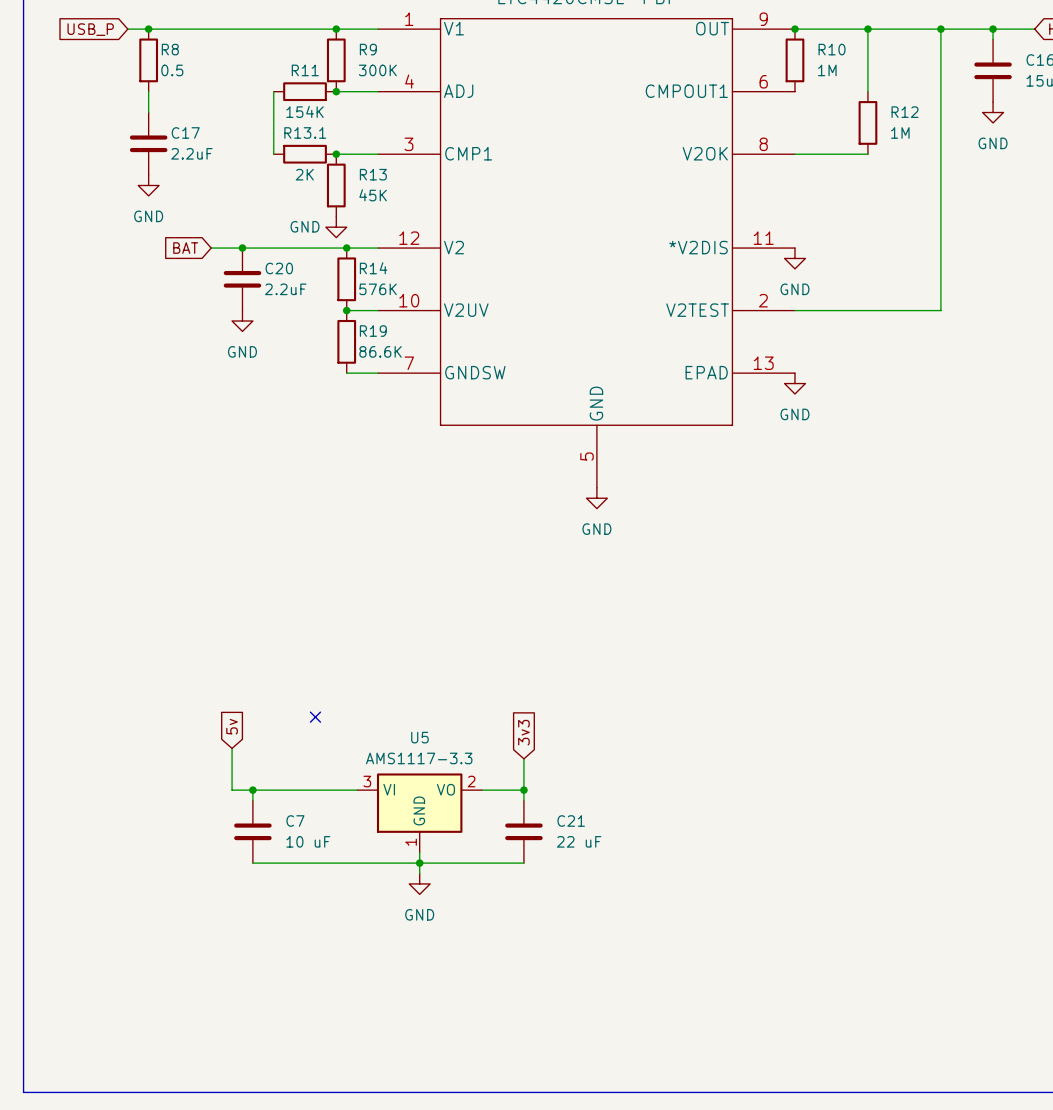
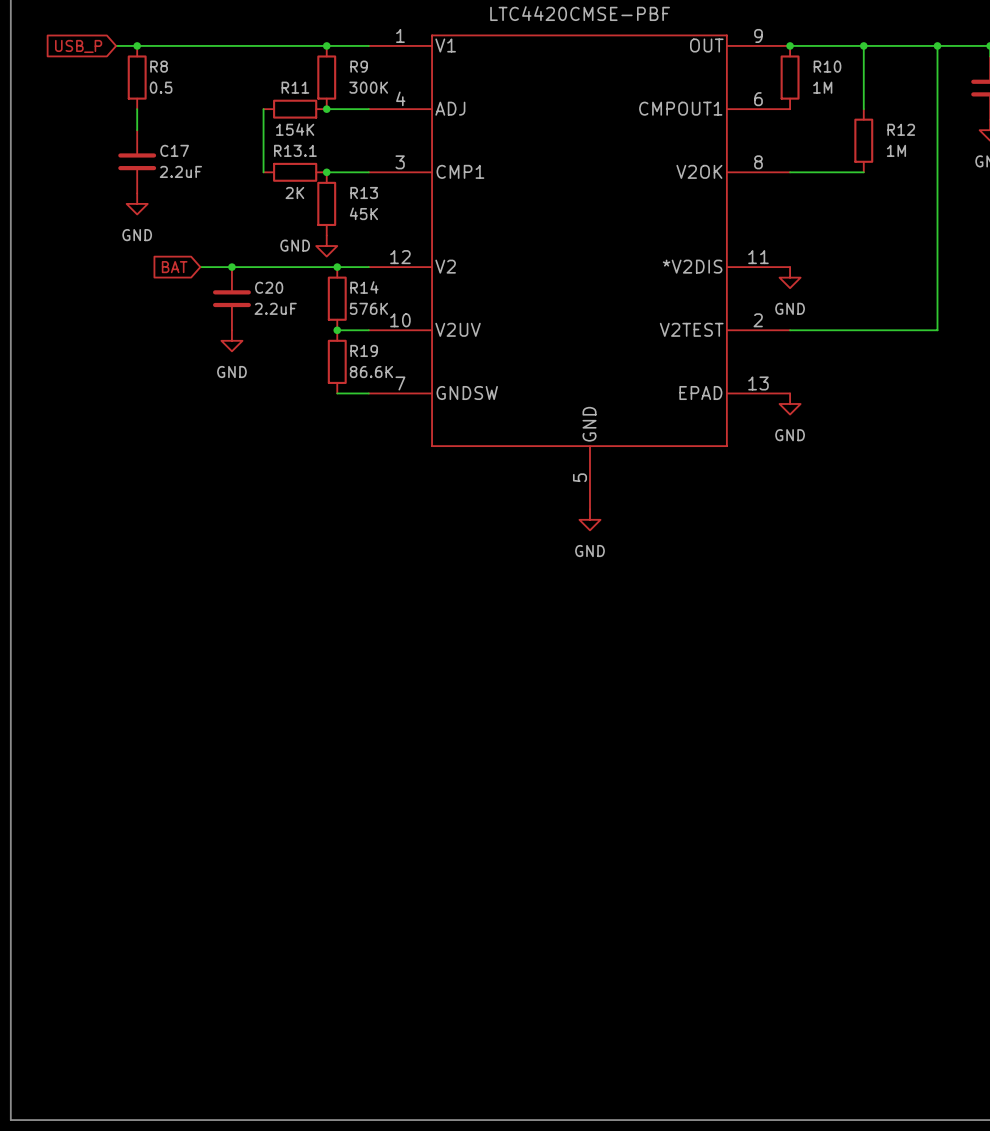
no-connect mark: (315, 717) -> none
global label: 5v (232, 726) -> none
global label: 3v3 (523, 732) -> none
wire: (232, 748) (232, 790) (357, 790) -> none
wire: (523, 758) (523, 800) -> none
wire: (252, 790) (252, 800) -> none
junction: (252, 790) -> none
wire: (482, 790) (523, 790) -> none
junction: (523, 790) -> none
U5: AMS1117-3.3 (419, 813) -> none
C7: 10 uF (252, 831) -> none
C21: 22 uF (523, 831) -> none
wire: (419, 852) (419, 873) -> none
wire: (252, 863) (523, 863) -> none
junction: (419, 863) -> none
power symbol: GND (419, 883) -> none

